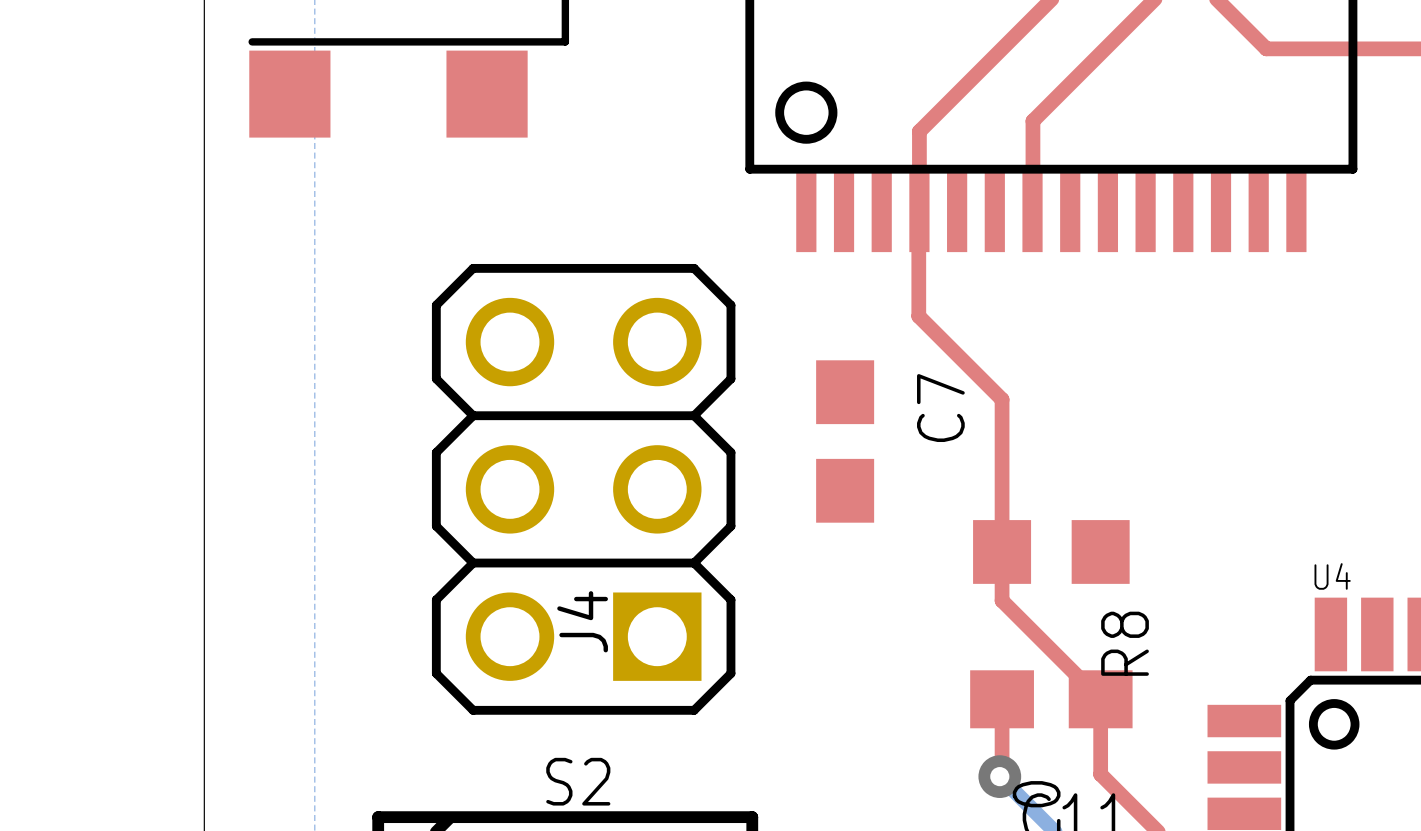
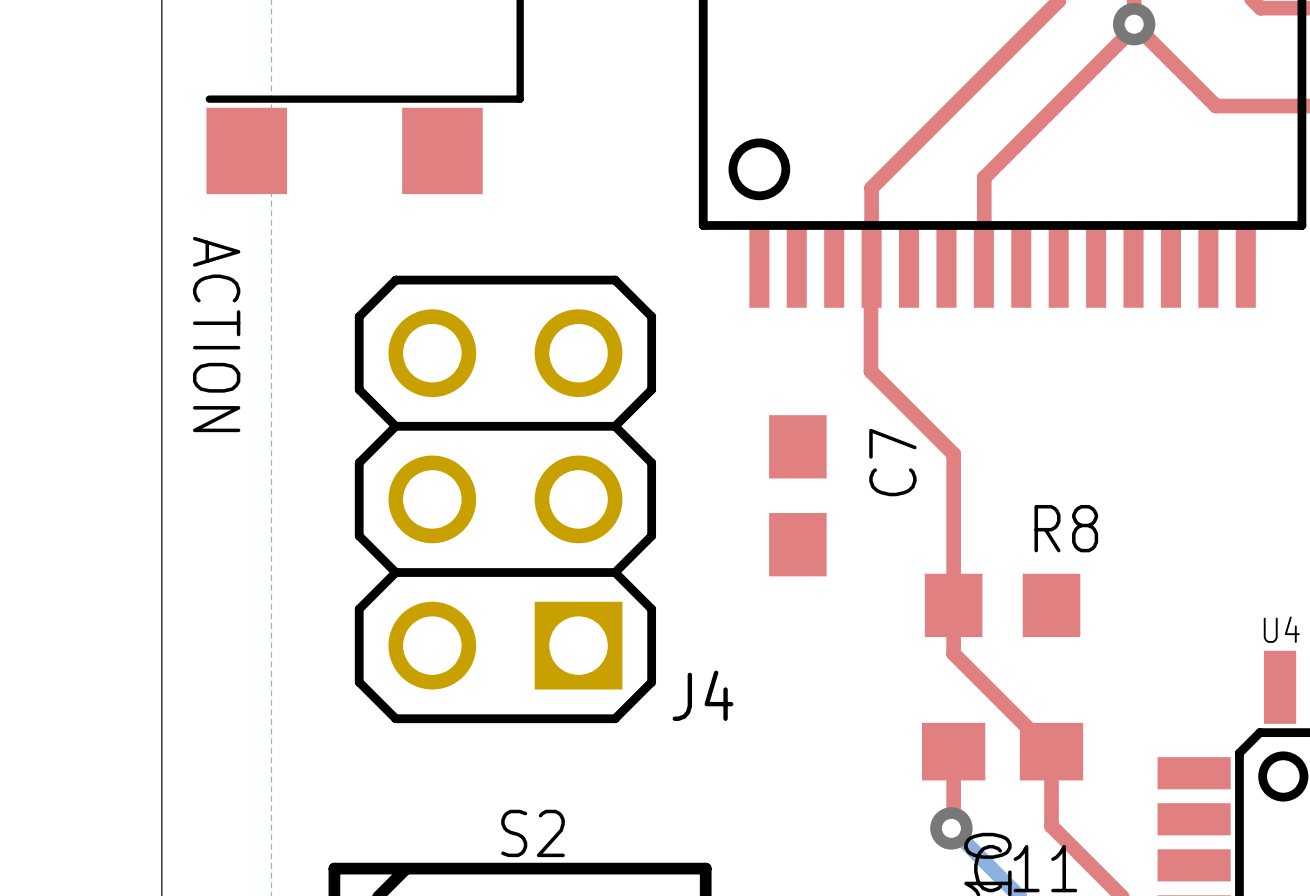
text: none -> ACTION (216, 334)
J4 position: (583, 489) -> (505, 499)
J4 name rotation: 0° (582, 621) -> 90° clockwise (703, 695)
J4 name position: J4 (582, 621) -> J4 (703, 695)
R8 name rotation: 0° (1125, 643) -> 90° clockwise (1066, 528)
R8 name position: R8 (1125, 643) -> R8 (1066, 528)

